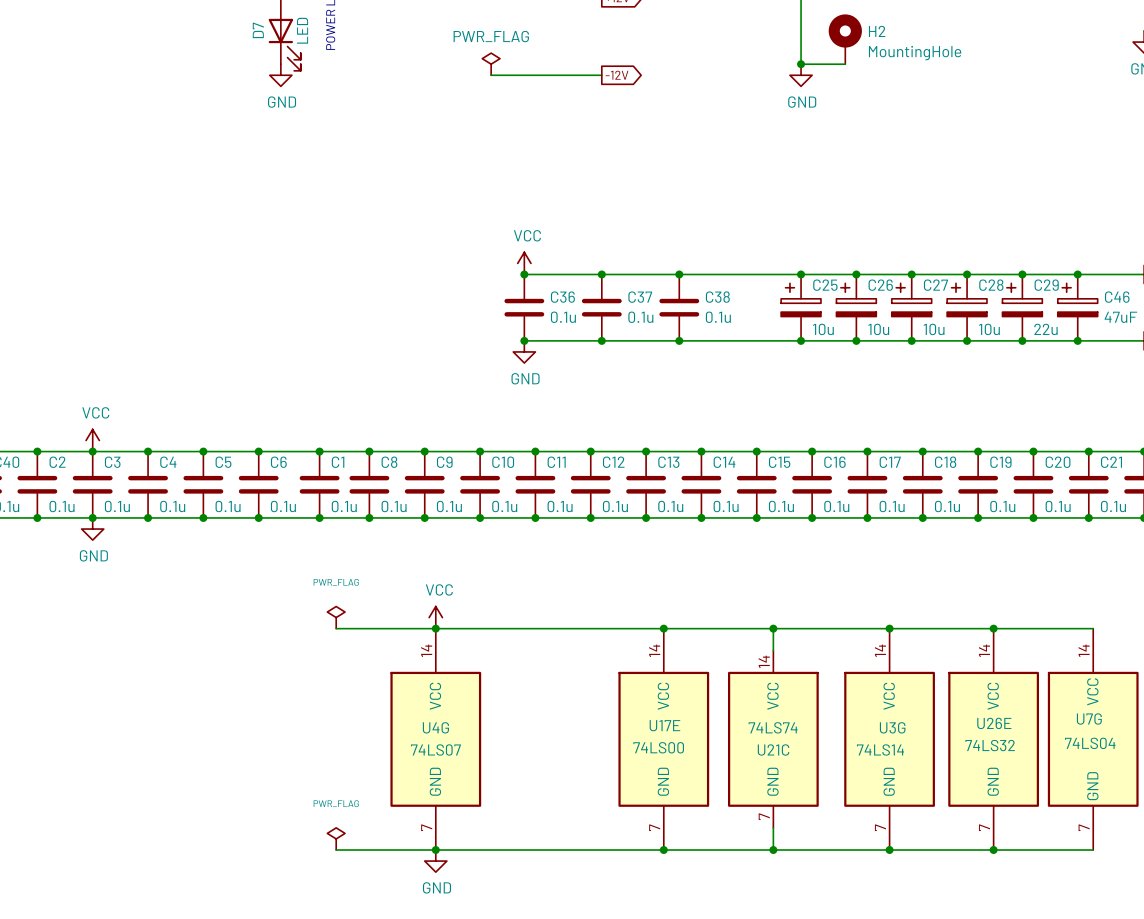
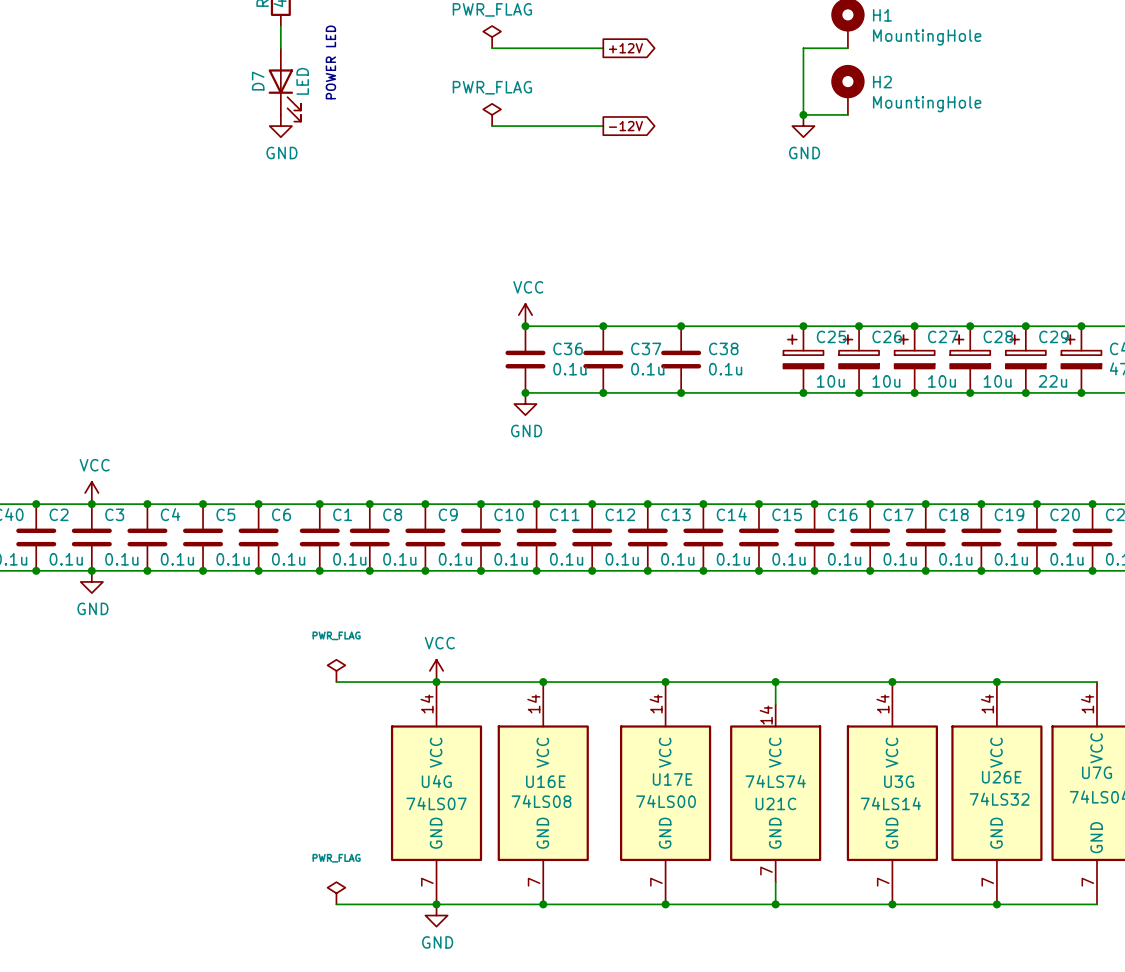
junction: none -> (543, 682)
U16E: none -> 74LS08 (543, 793)
junction: none -> (543, 904)

